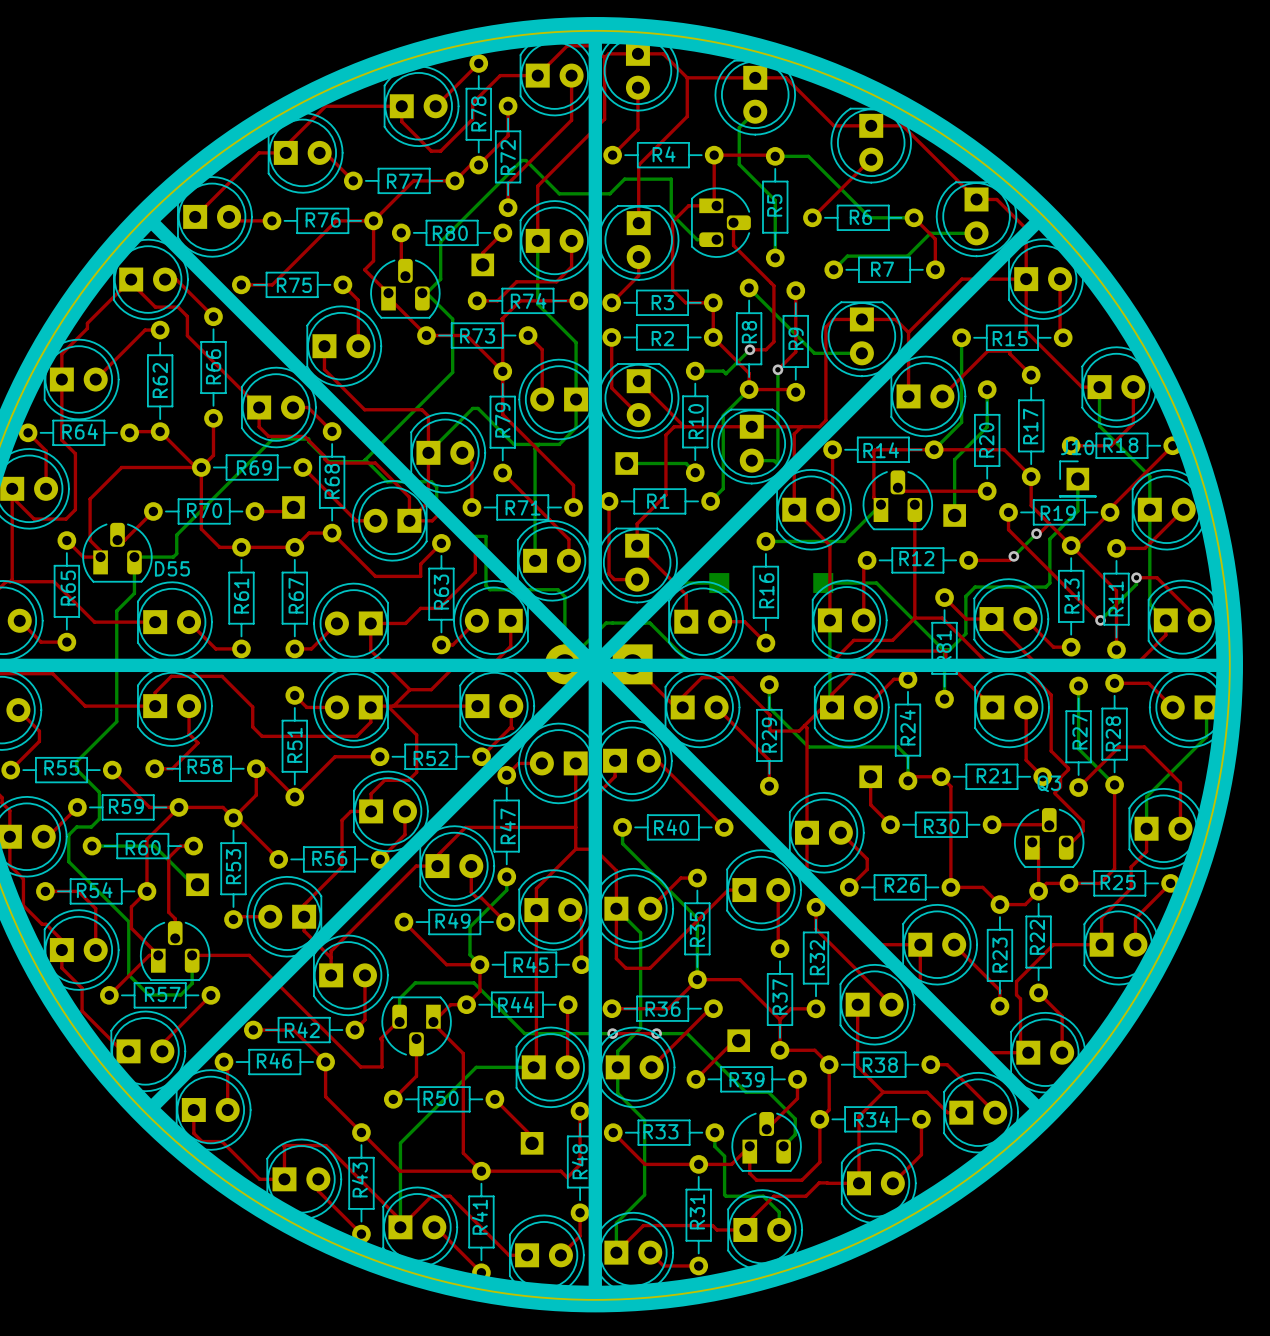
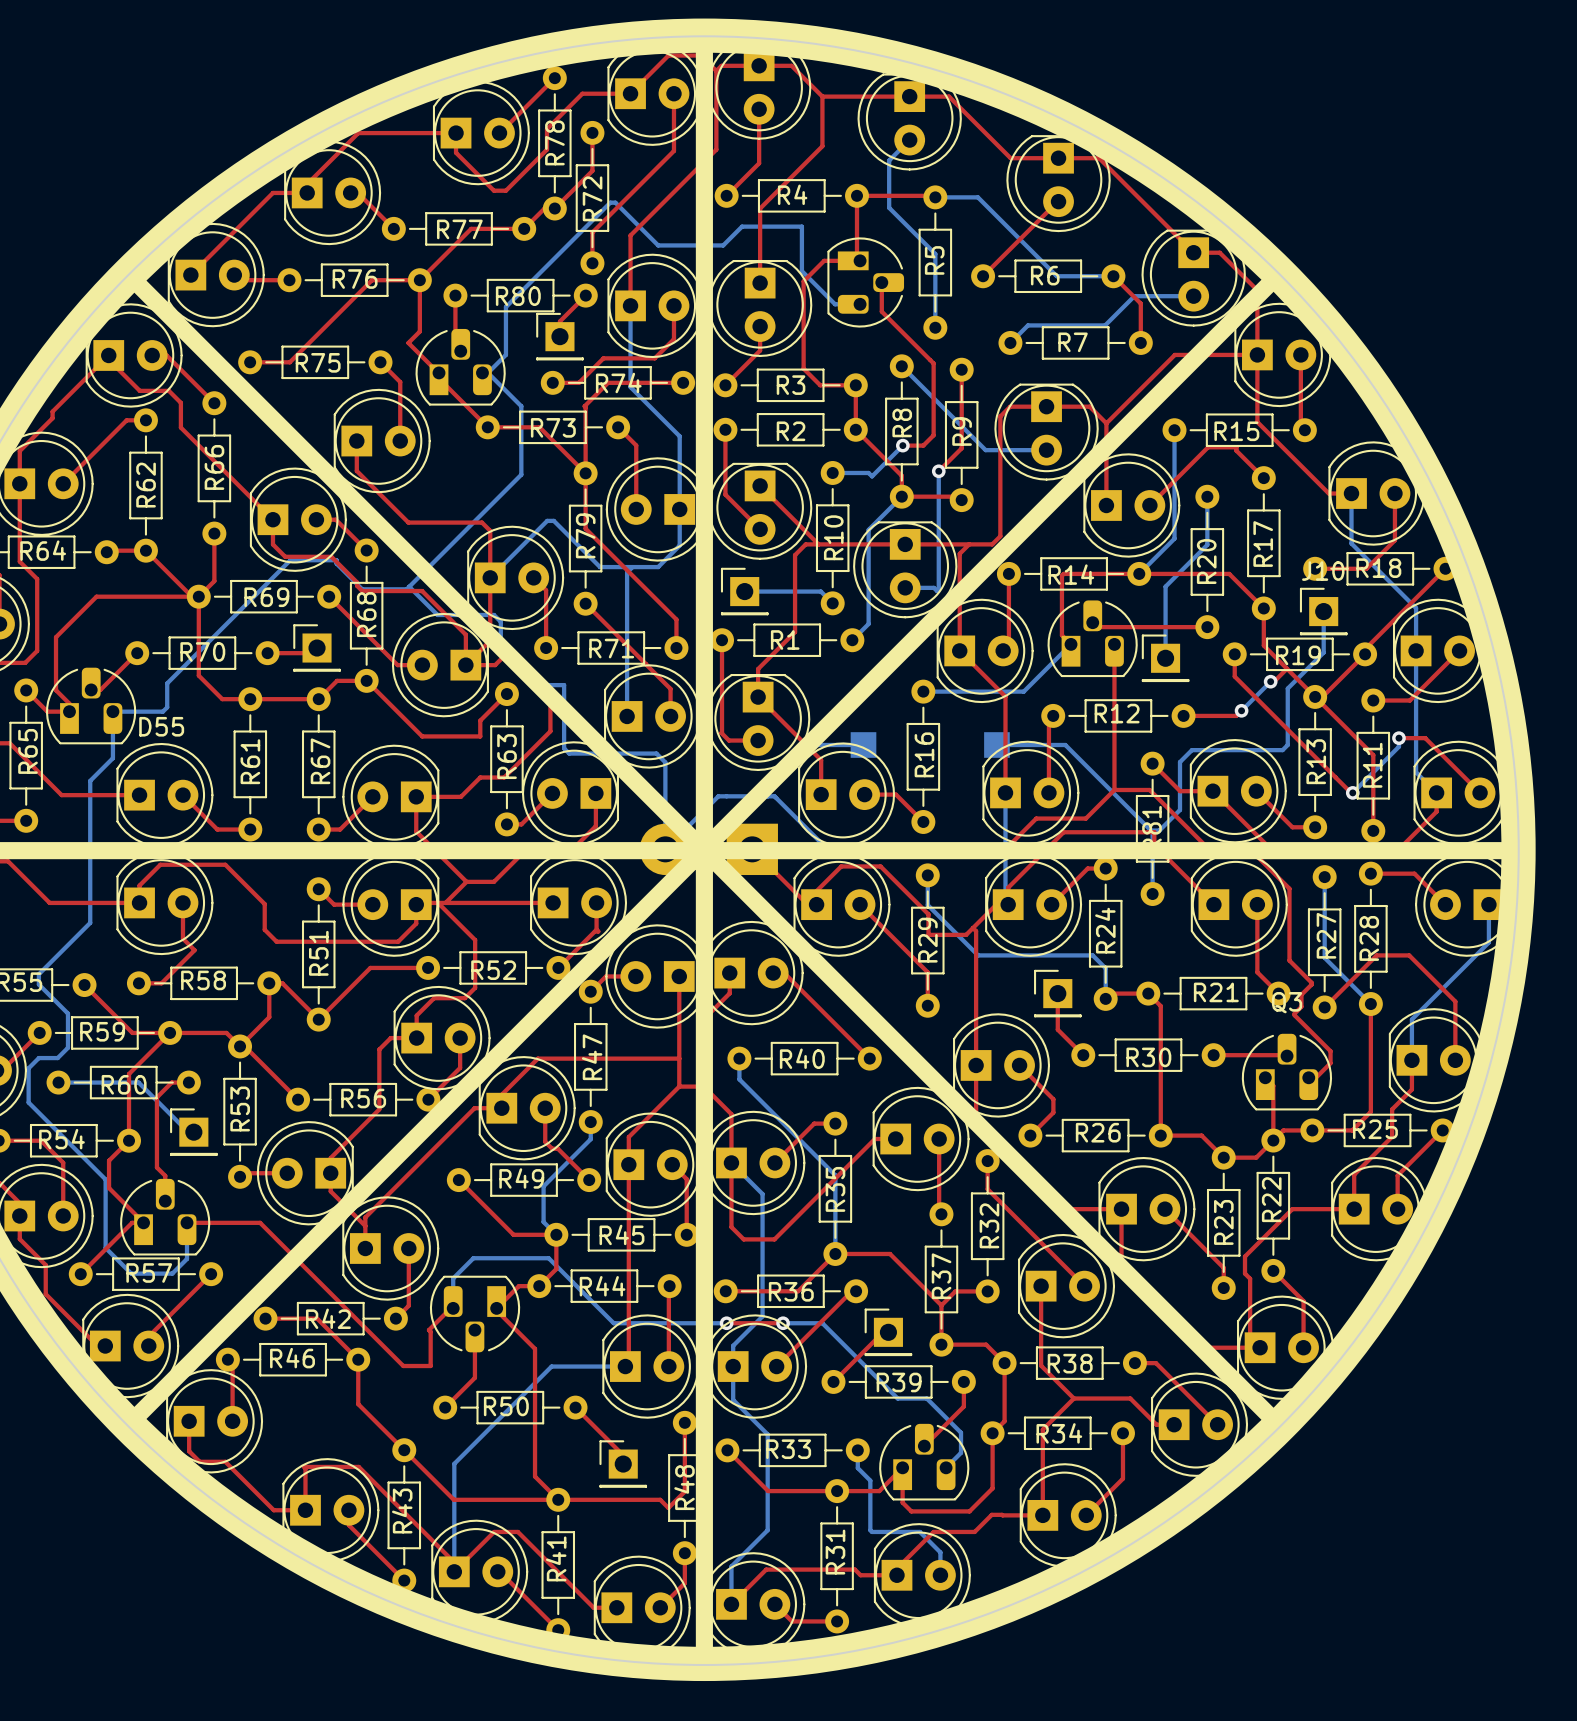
part side: bottom (482, 264) -> top (559, 336)
part side: bottom (626, 463) -> top (744, 591)
part side: bottom (293, 507) -> top (317, 648)
part side: bottom (954, 515) -> top (1165, 658)
part side: bottom (870, 776) -> top (1057, 993)
part side: bottom (197, 884) -> top (193, 1132)
part side: bottom (738, 1040) -> top (888, 1332)
part side: bottom (532, 1143) -> top (623, 1464)

